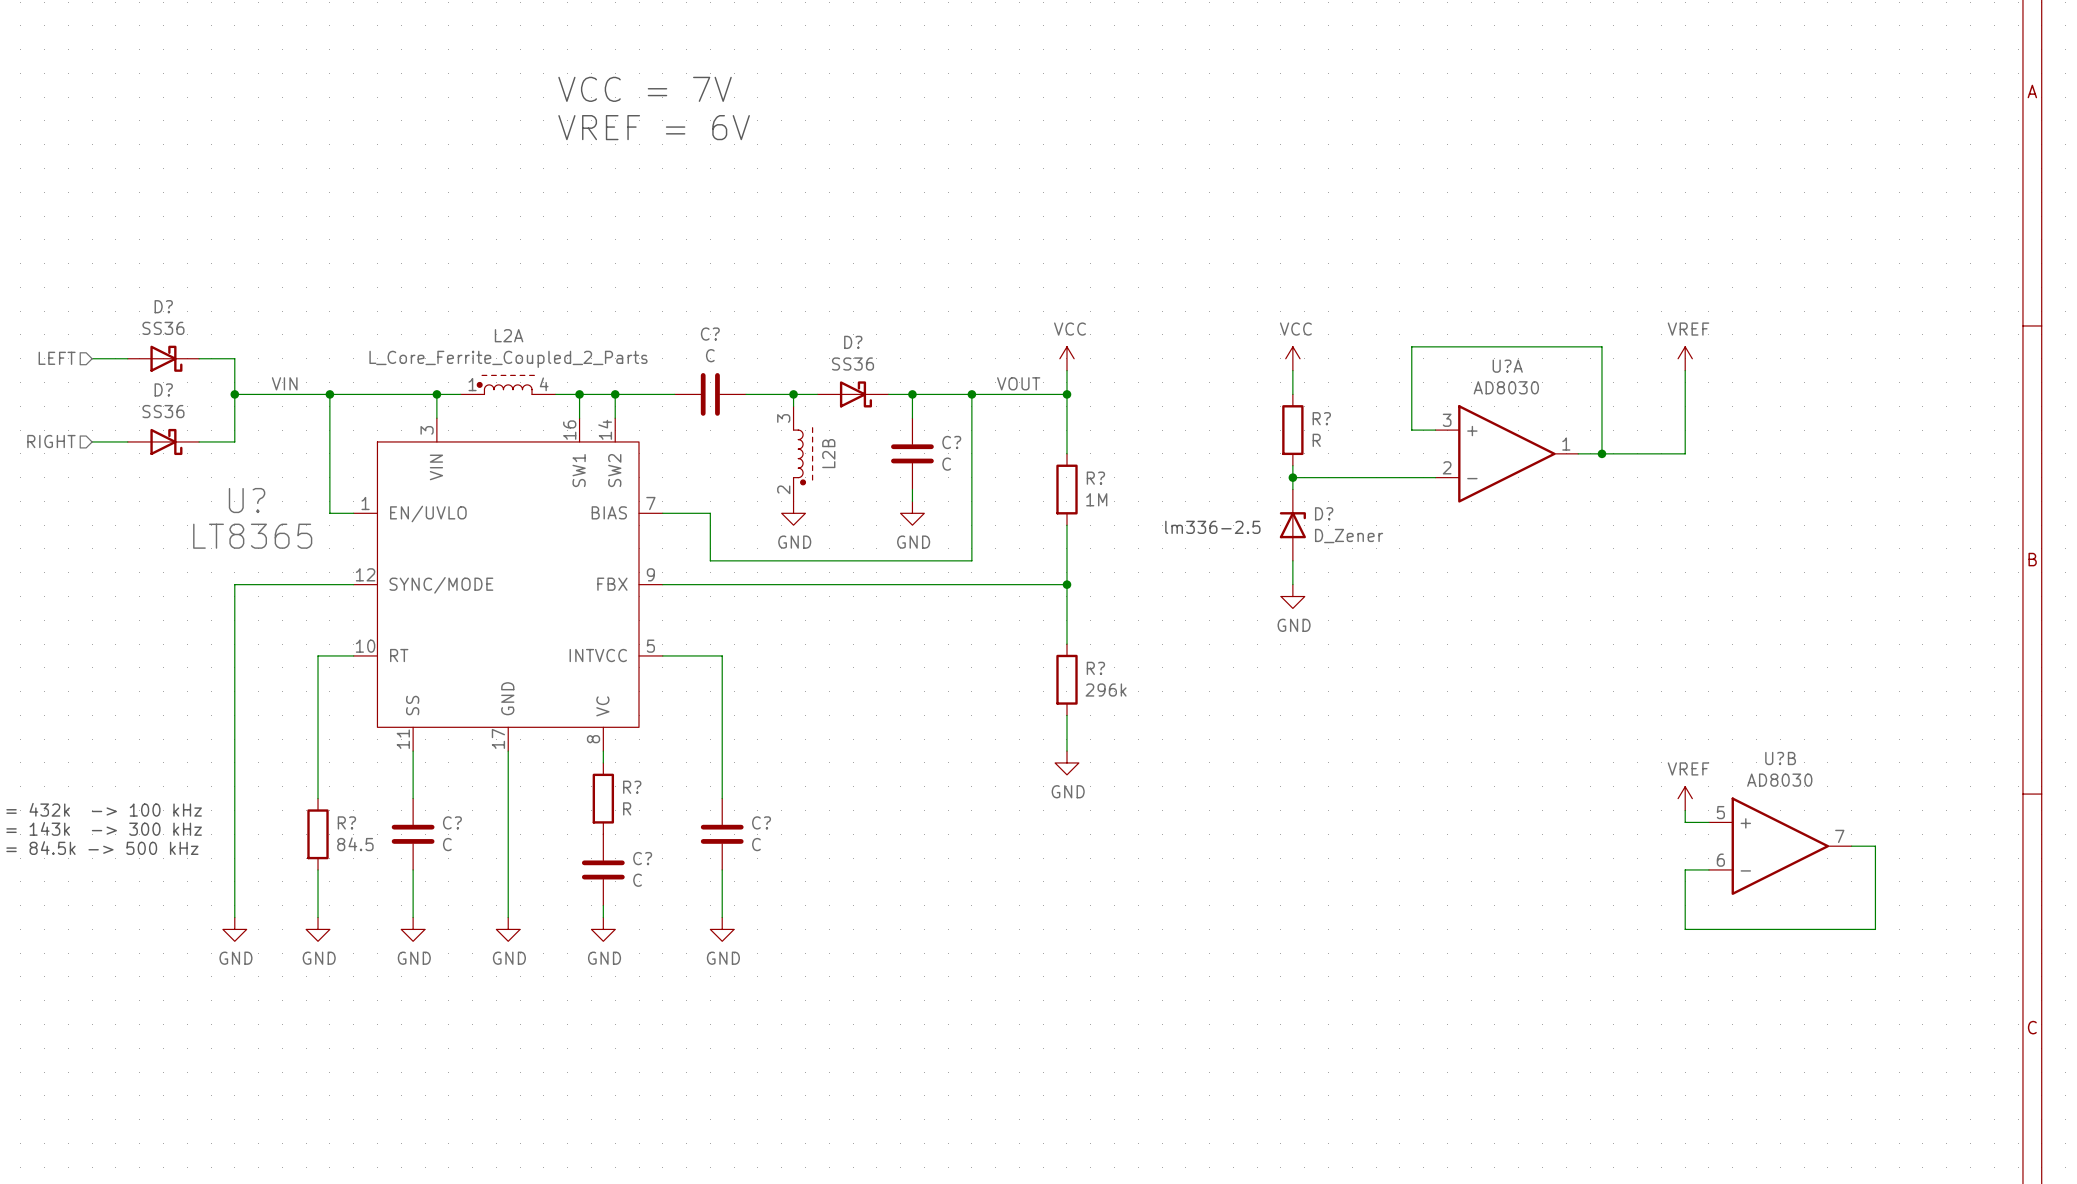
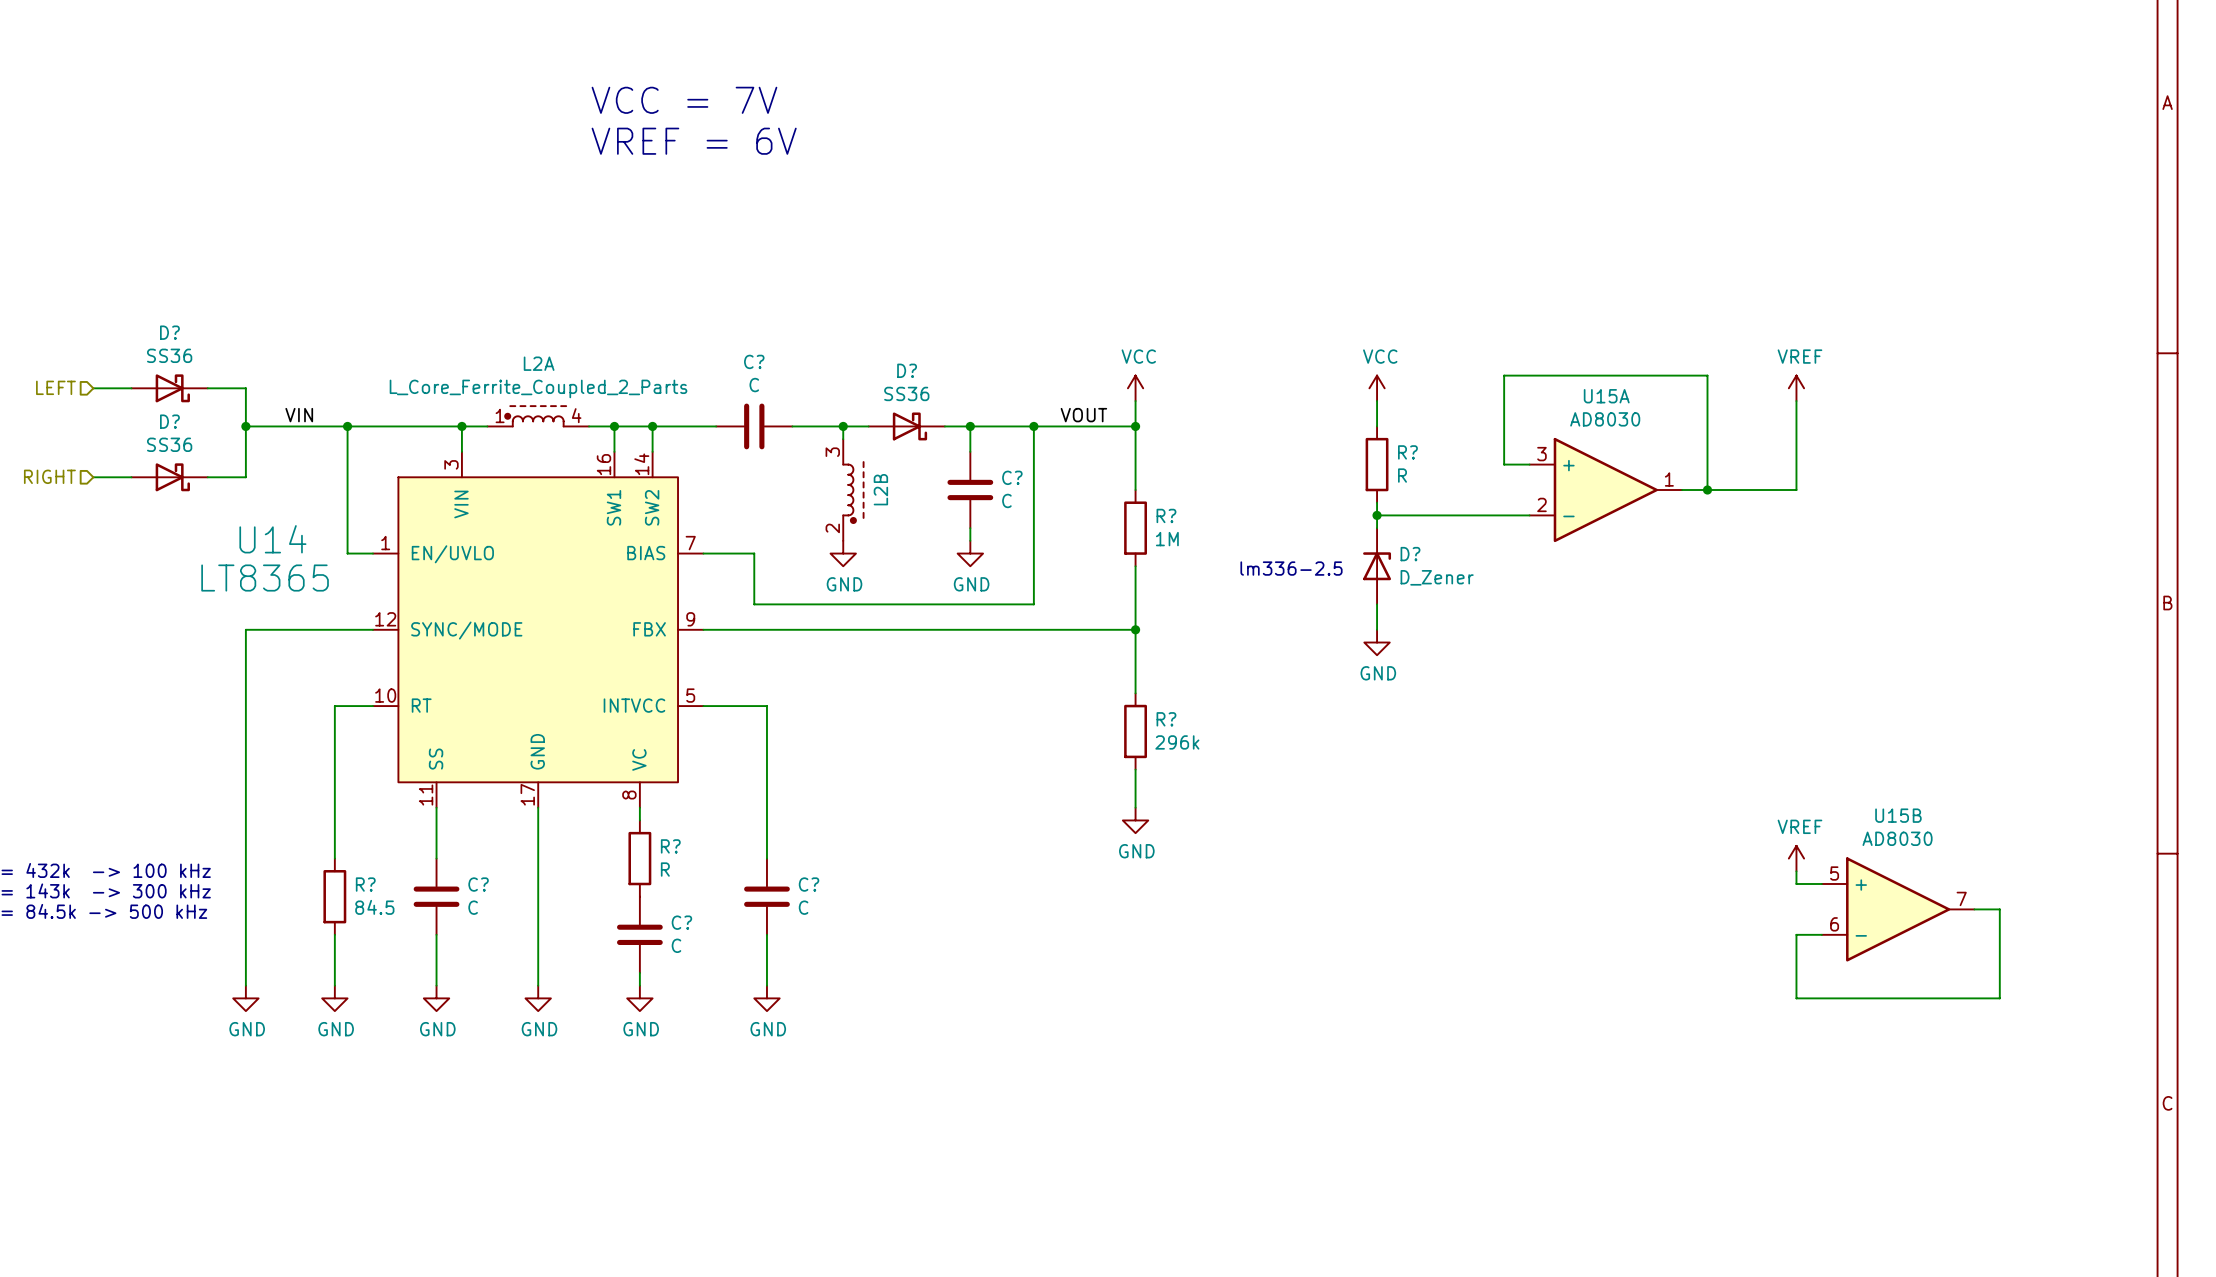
U?A name: U?A (1507, 366) -> U15A (1606, 396)
U? name: U? (247, 500) -> U14 (272, 539)
U?B name: U?B (1780, 758) -> U15B (1898, 815)

